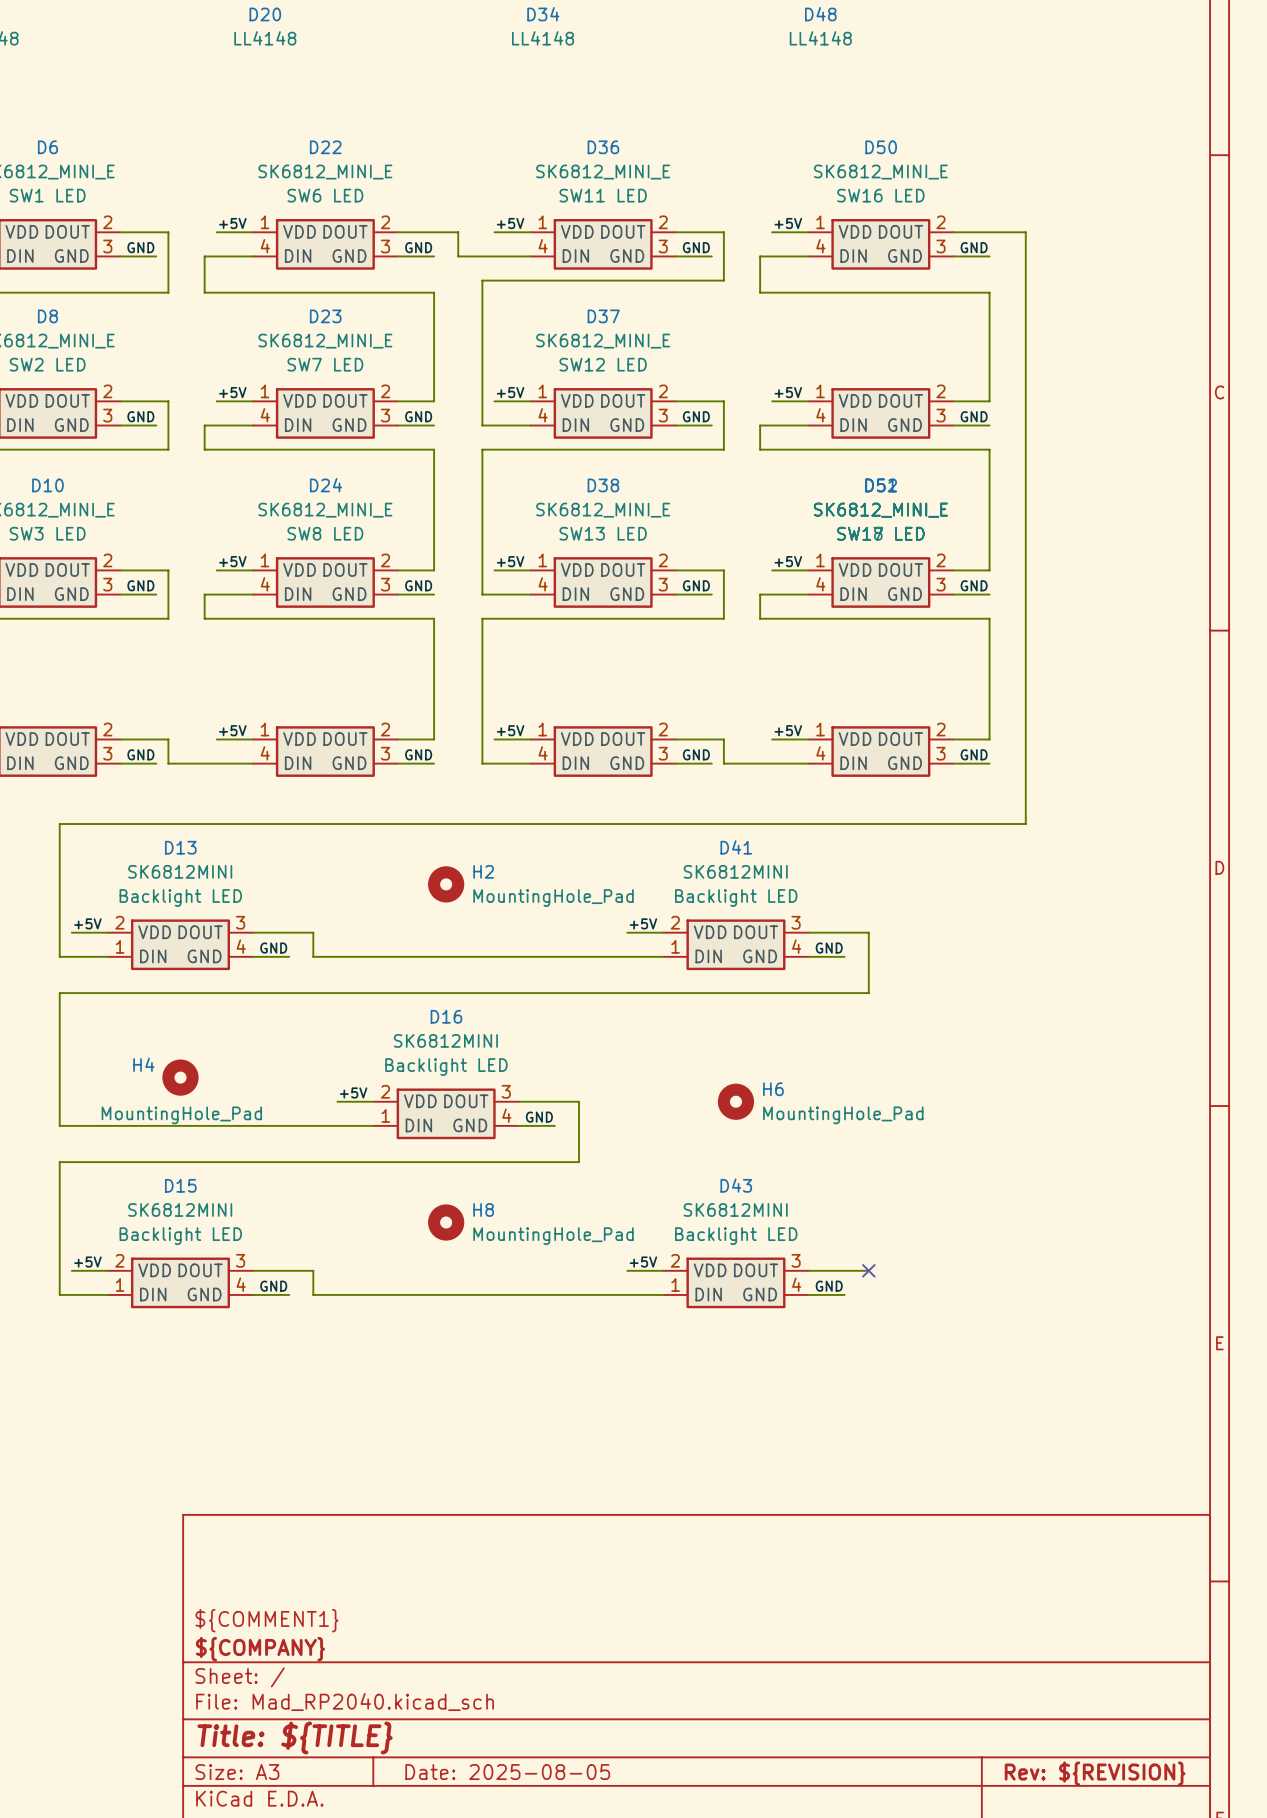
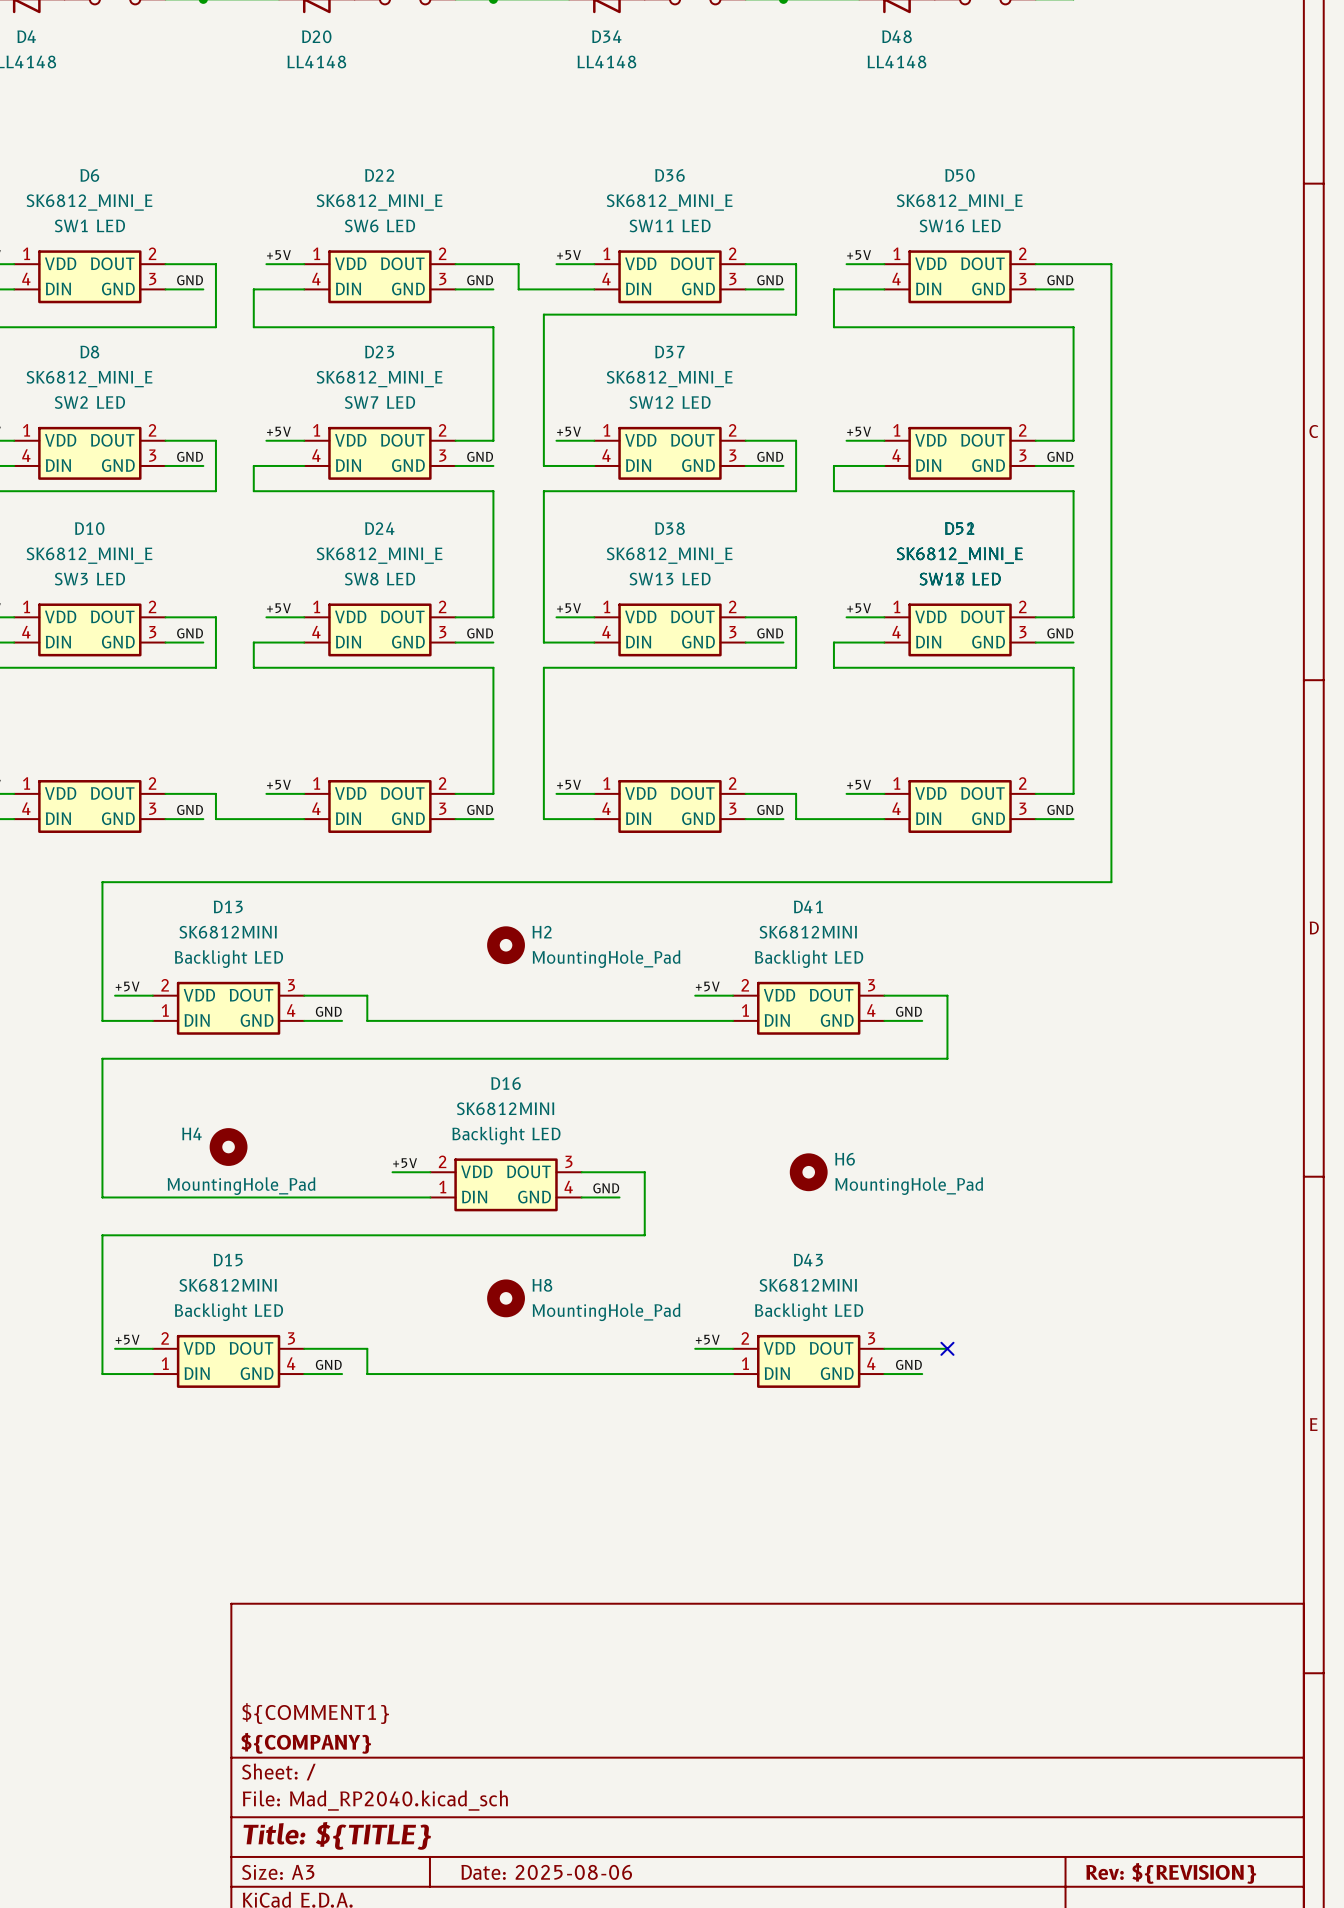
title block: Date: 2025-08-05 (507, 1772) -> Date: 2025-08-06 (546, 1872)

